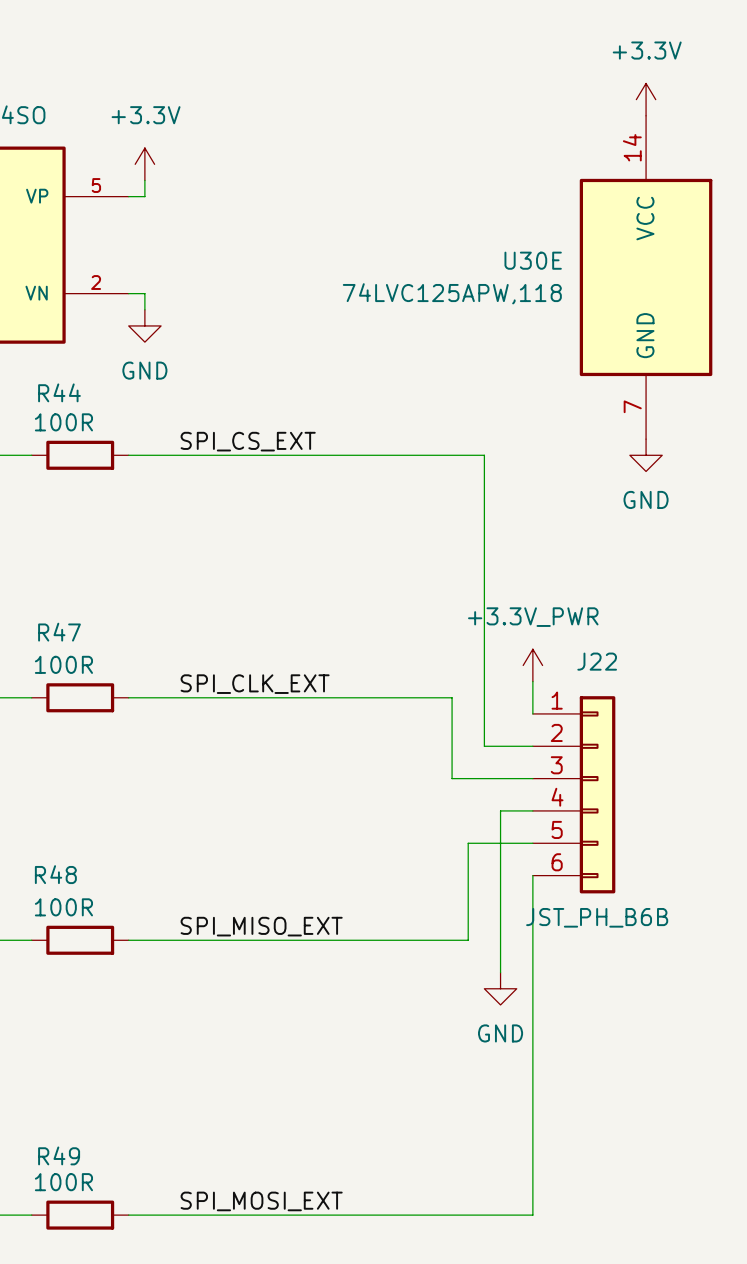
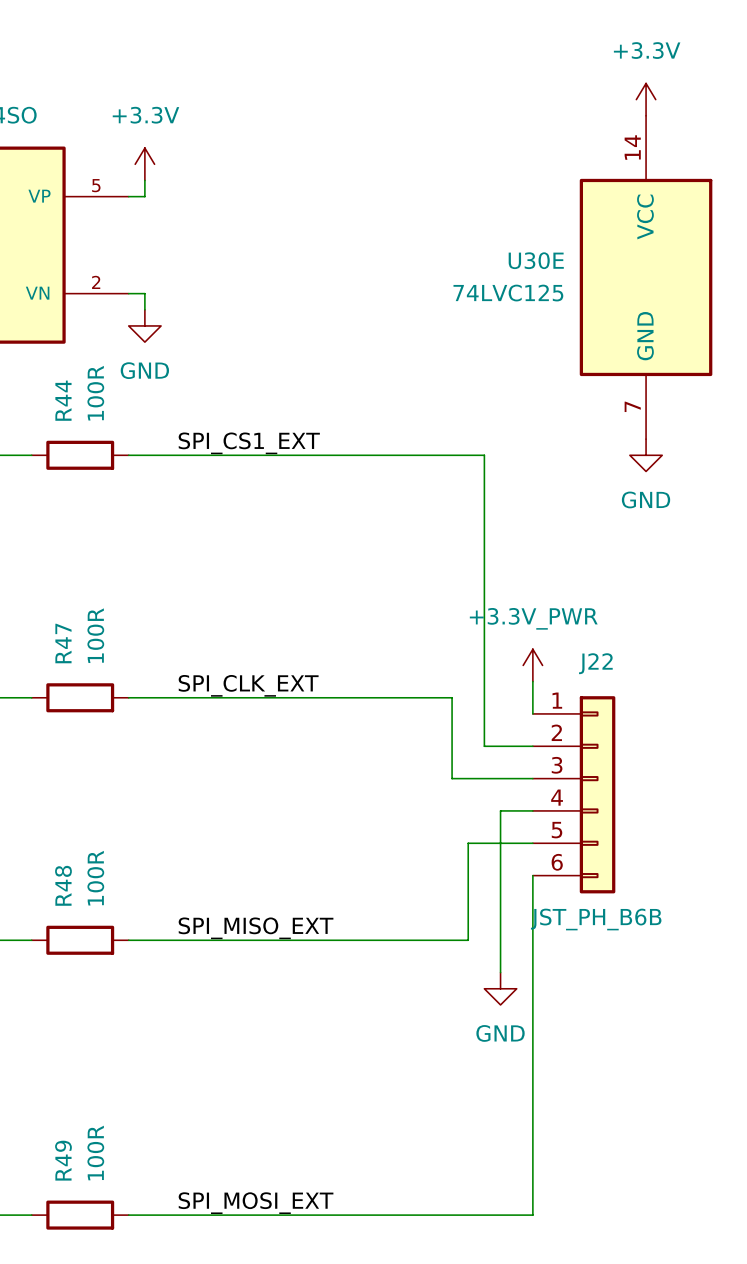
U30E value: 74LVC125APW,118 (452, 293) -> 74LVC125 (508, 293)
R44 name rotation: 0° (59, 392) -> 90° counterclockwise (63, 400)
R44 value rotation: 0° (63, 422) -> 90° counterclockwise (95, 393)
label: SPI_CS_EXT (248, 441) -> SPI_CS1_EXT (249, 443)
R47 name rotation: 0° (59, 632) -> 90° counterclockwise (63, 643)
R47 value rotation: 0° (63, 664) -> 90° counterclockwise (95, 635)
R48 name rotation: 0° (55, 874) -> 90° counterclockwise (63, 885)
R48 value rotation: 0° (63, 907) -> 90° counterclockwise (95, 878)
R49 name rotation: 0° (59, 1155) -> 90° counterclockwise (63, 1160)
R49 value rotation: 0° (63, 1182) -> 90° counterclockwise (95, 1153)

